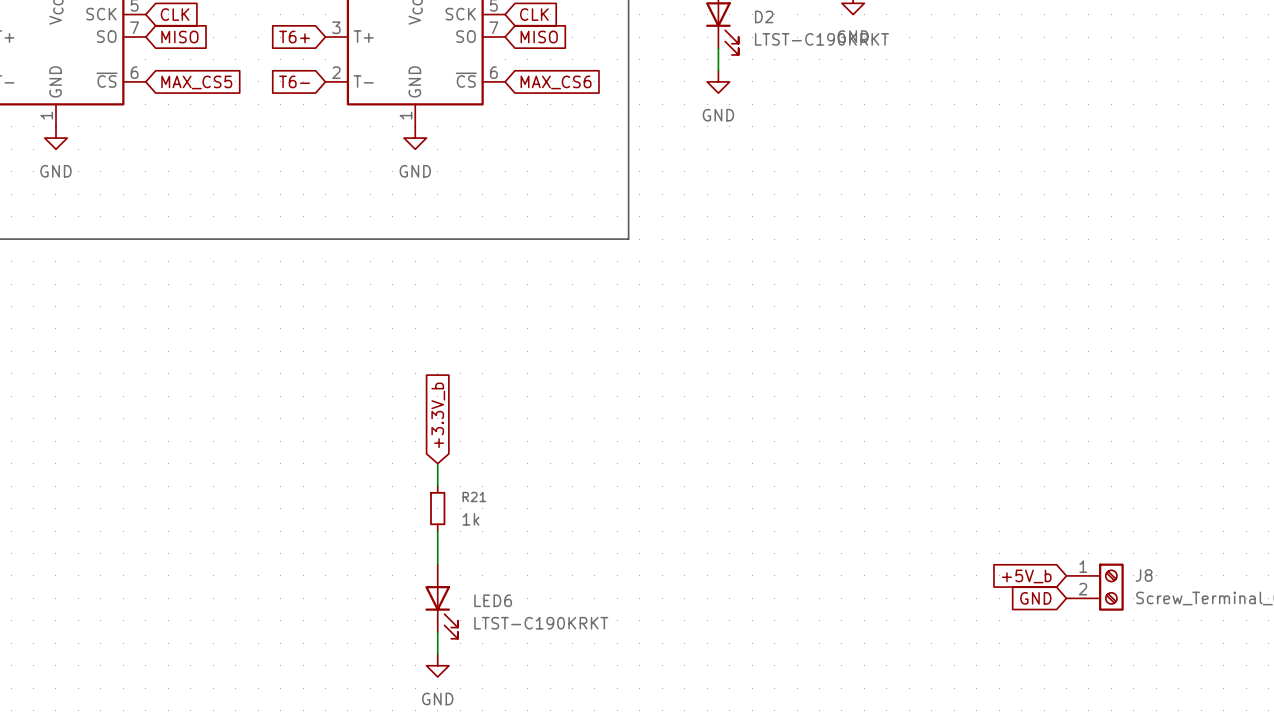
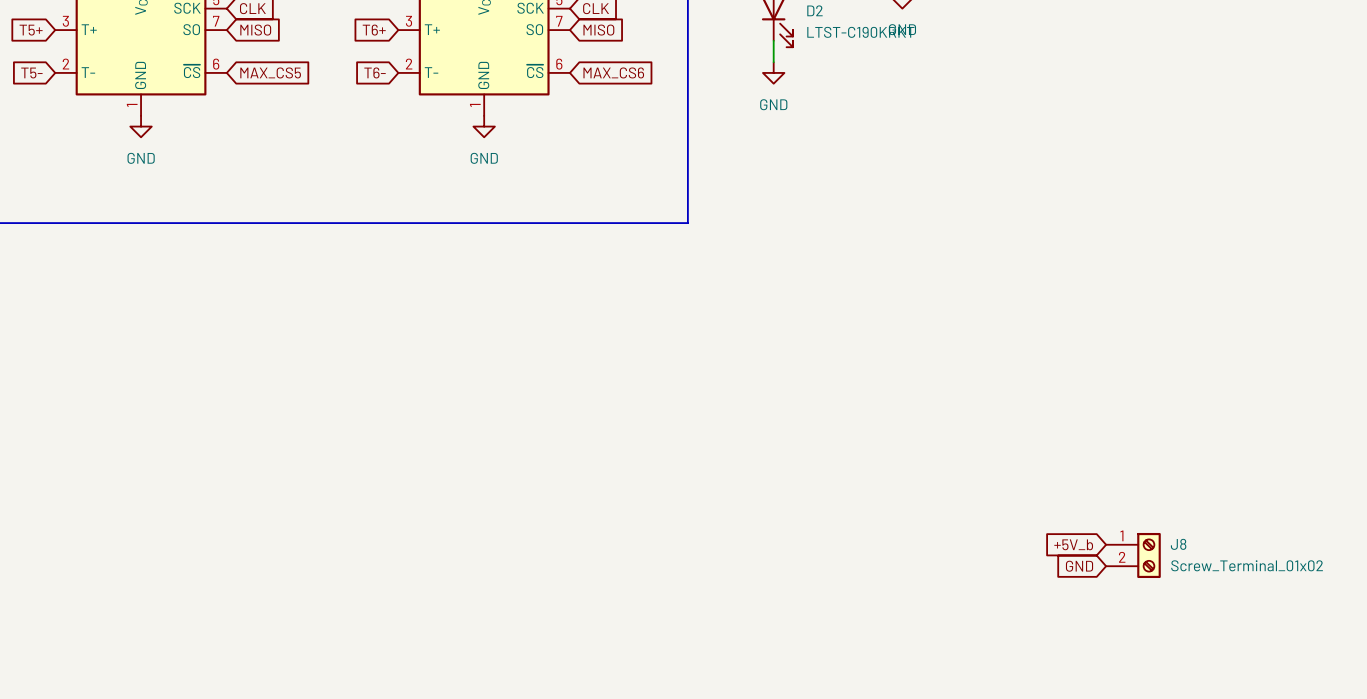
global label: +3.3V_b (438, 415) -> none
wire: (437, 463) (437, 486) -> none
R21: 1k (437, 508) -> none
wire: (437, 531) (437, 564) -> none
LED6: LTST-C190KRKT (441, 601) -> none
wire: (437, 632) (437, 654) -> none
power symbol: GND (437, 665) -> none

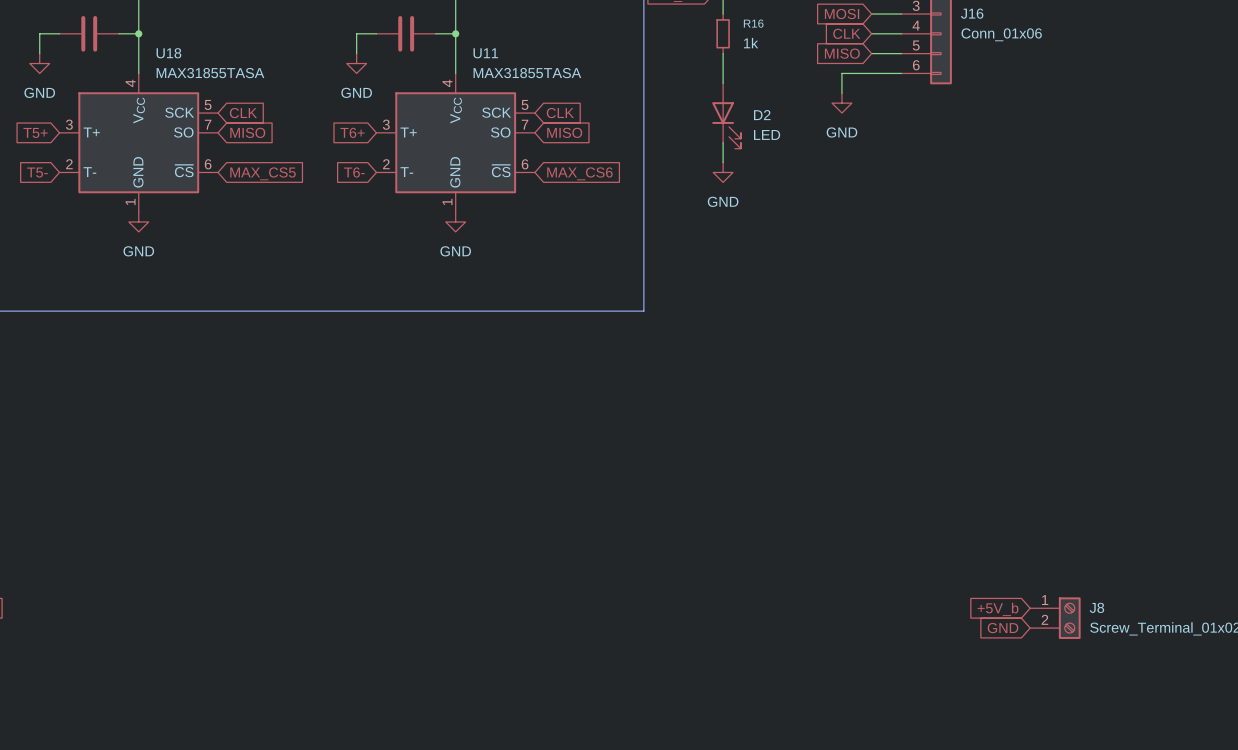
D2 value: LTST-C190KRKT (860, 32) -> LED (767, 134)

